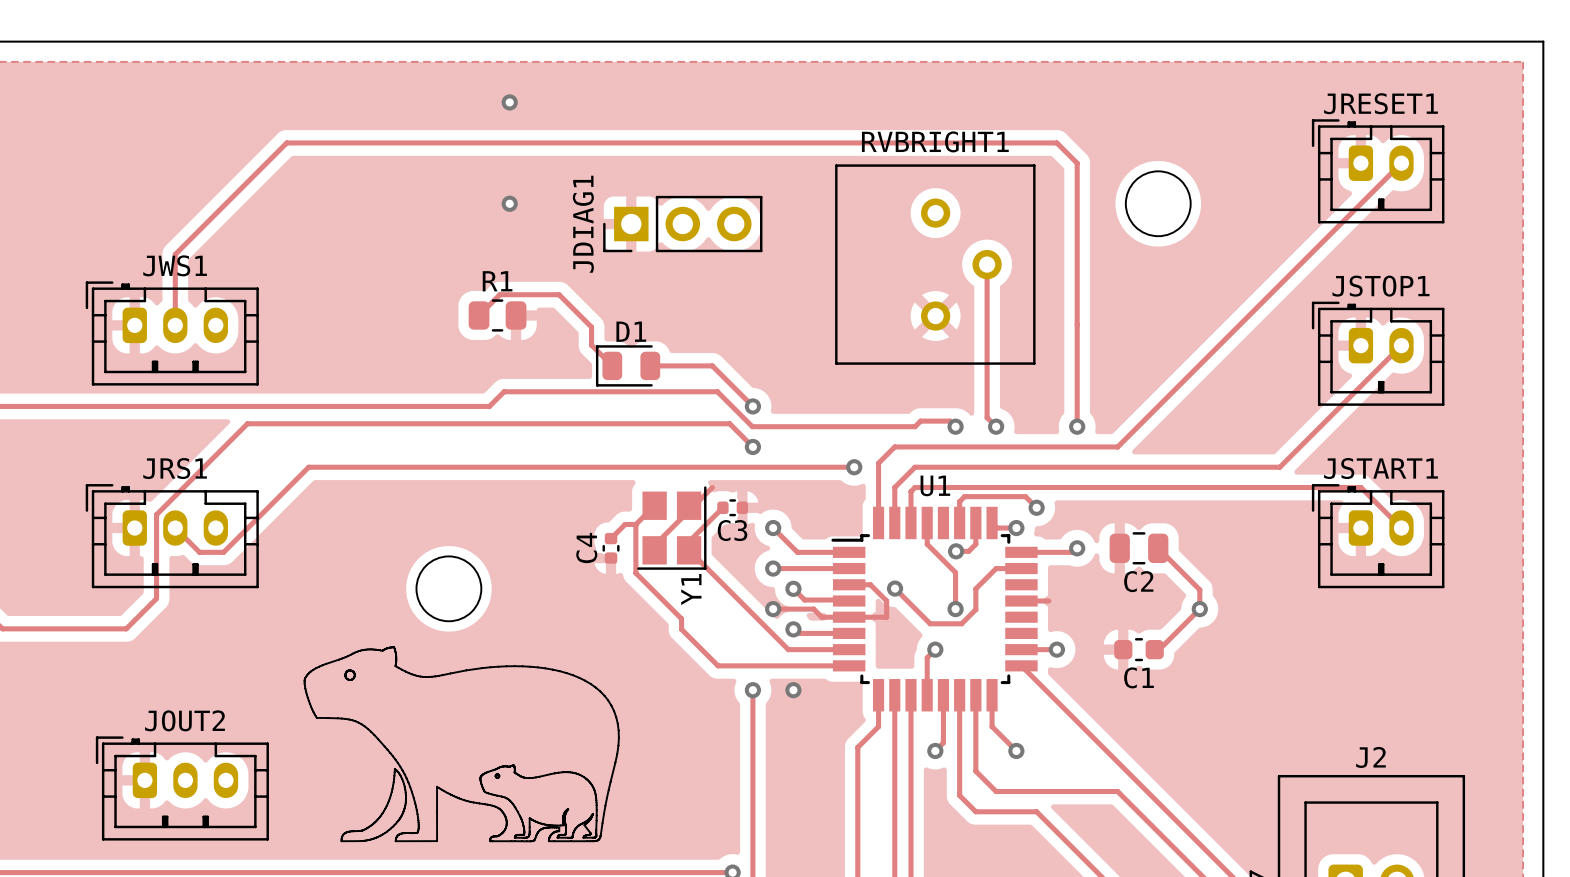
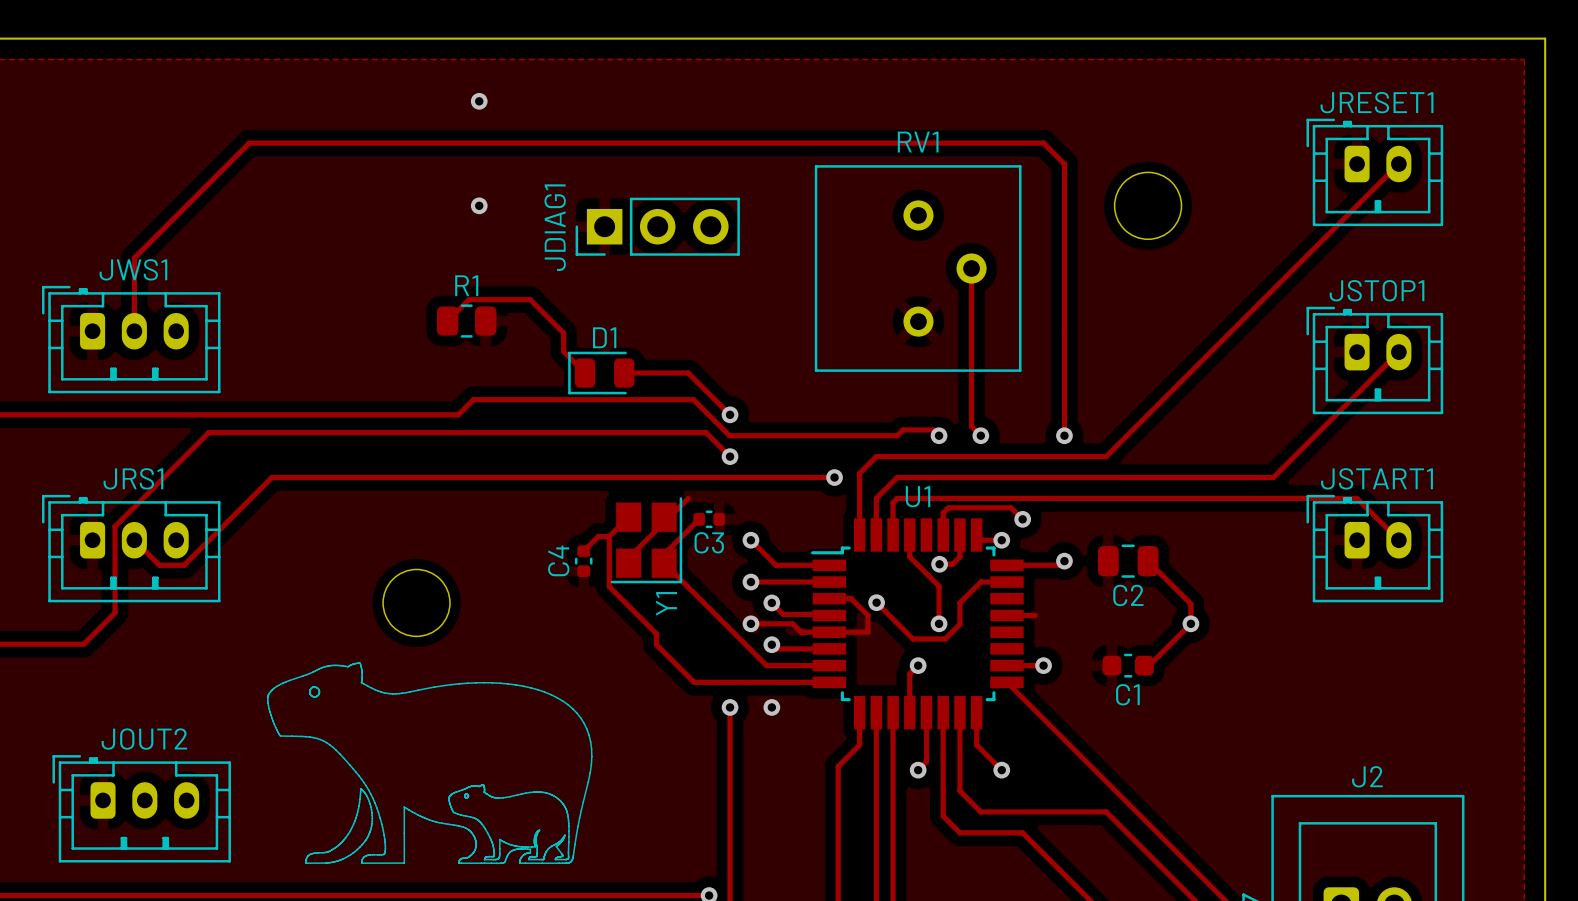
RVBRIGHT1 name: RVBRIGHT1 (935, 141) -> RV1 (918, 142)

